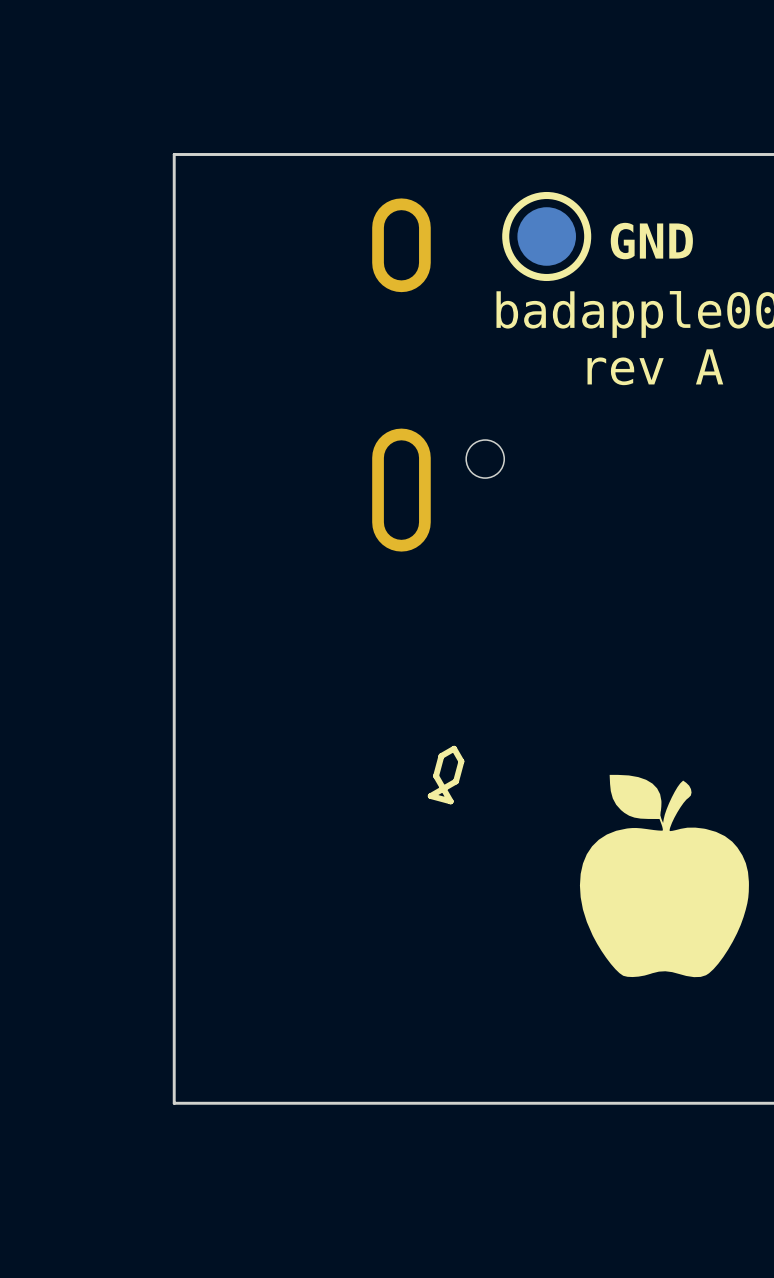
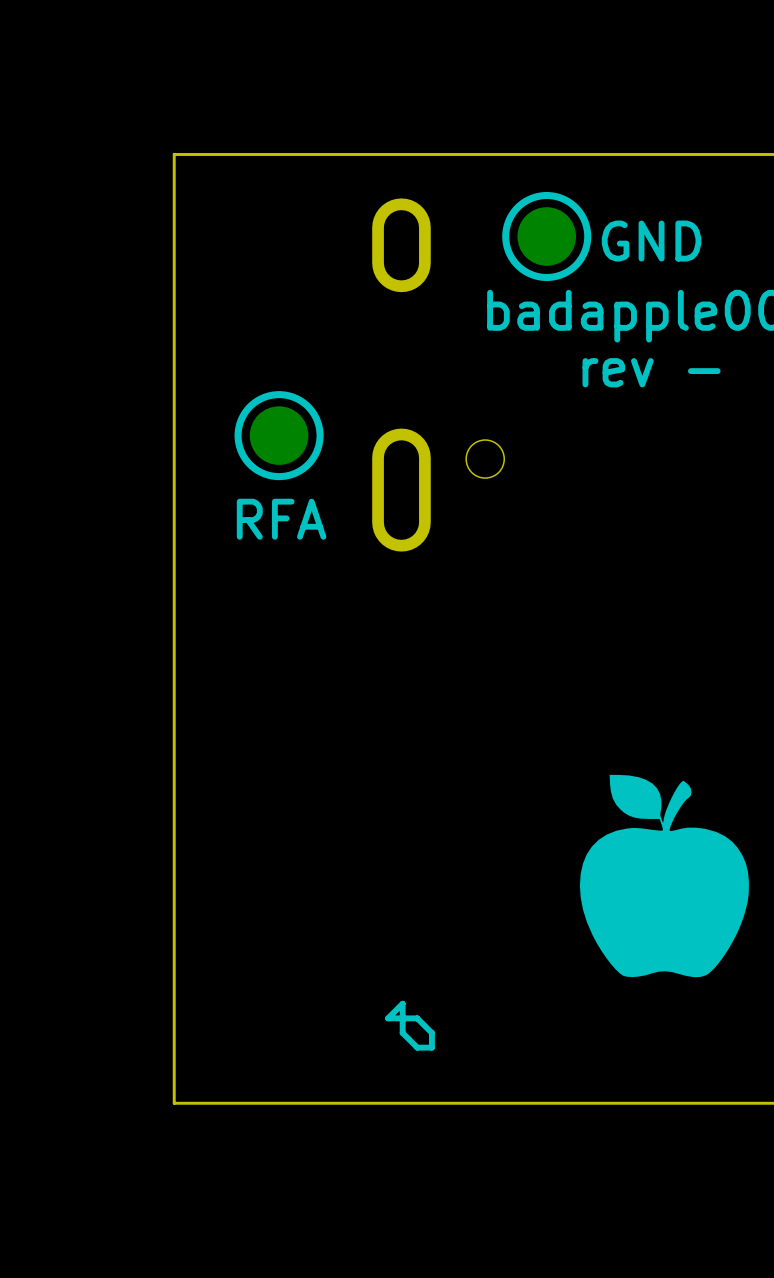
text: rev A (655, 367) -> rev - (651, 372)
part: none -> RFA (279, 435)
line: (454, 748) (461, 761) (456, 781) (430, 796) (450, 801) (436, 776) (441, 756) (454, 748) -> none
line: none -> (402, 1003) (402, 1032) (417, 1047) (431, 1047) (431, 1032) (417, 1018) (388, 1018) (402, 1003)

